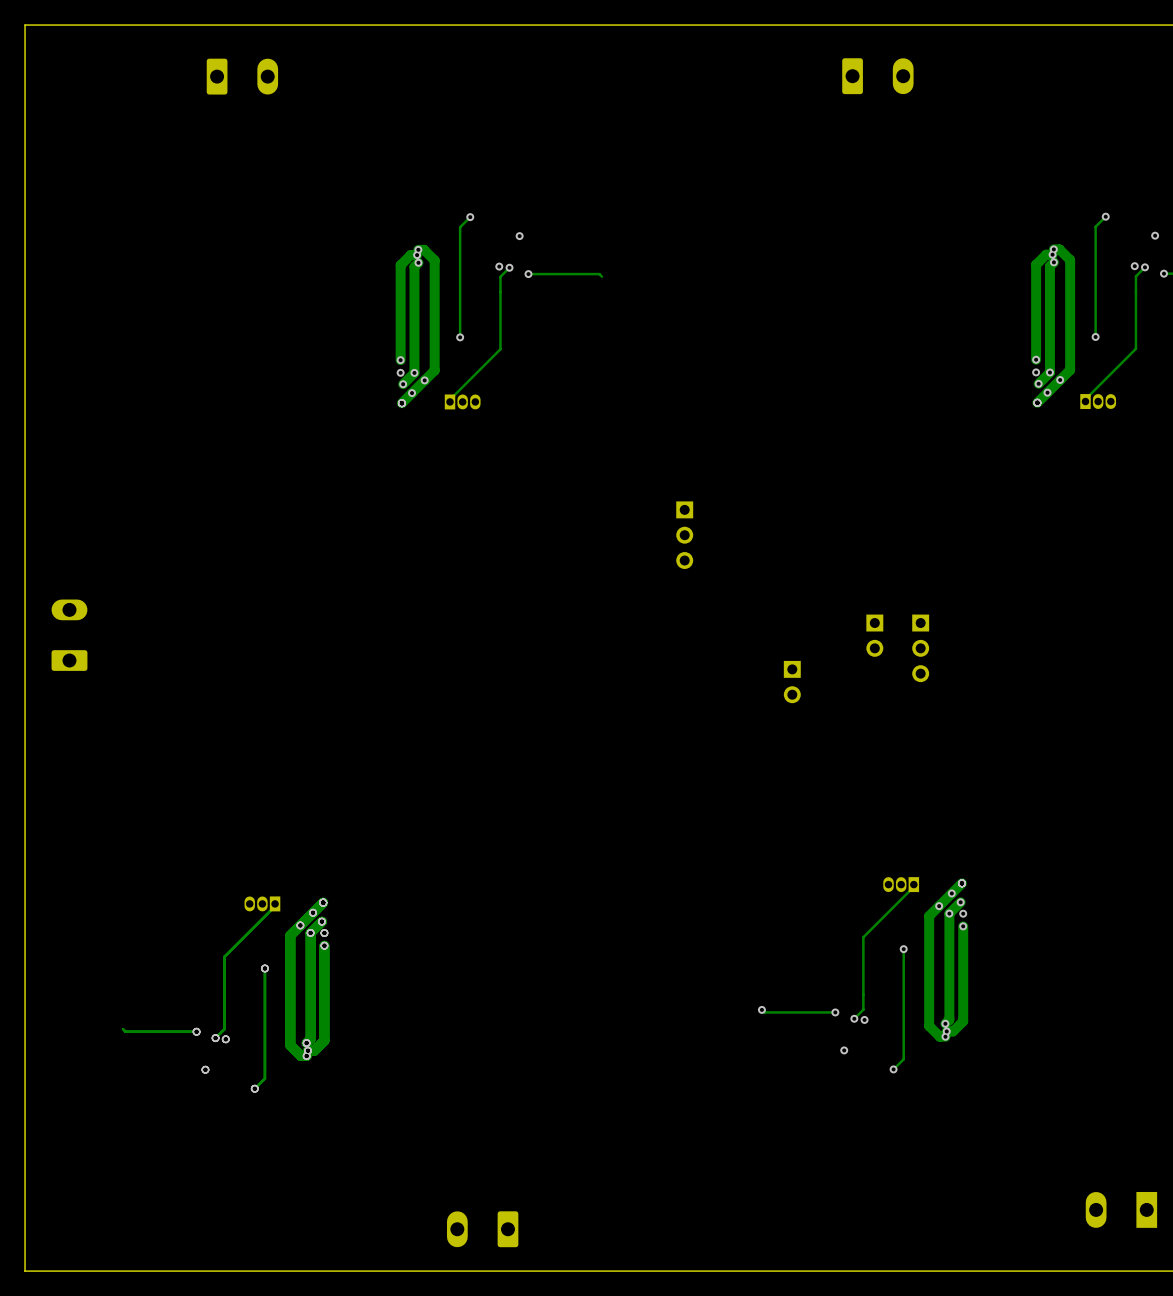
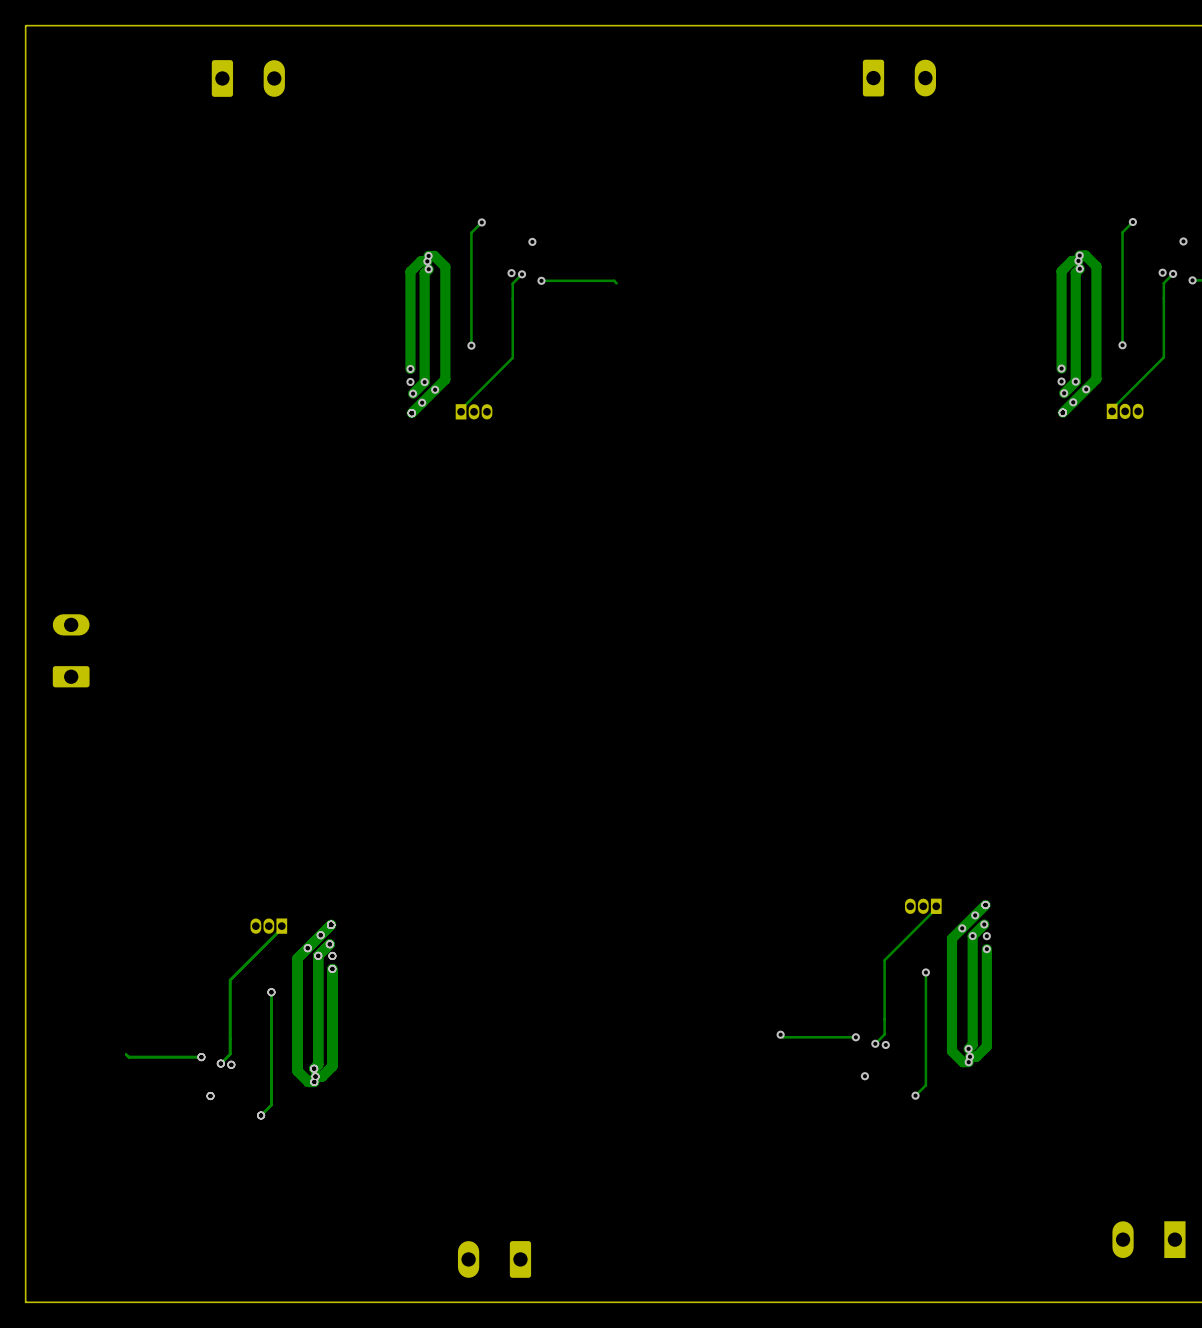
part: (684, 535) -> none
part: (874, 635) -> none
part: (920, 648) -> none
part: (792, 682) -> none

